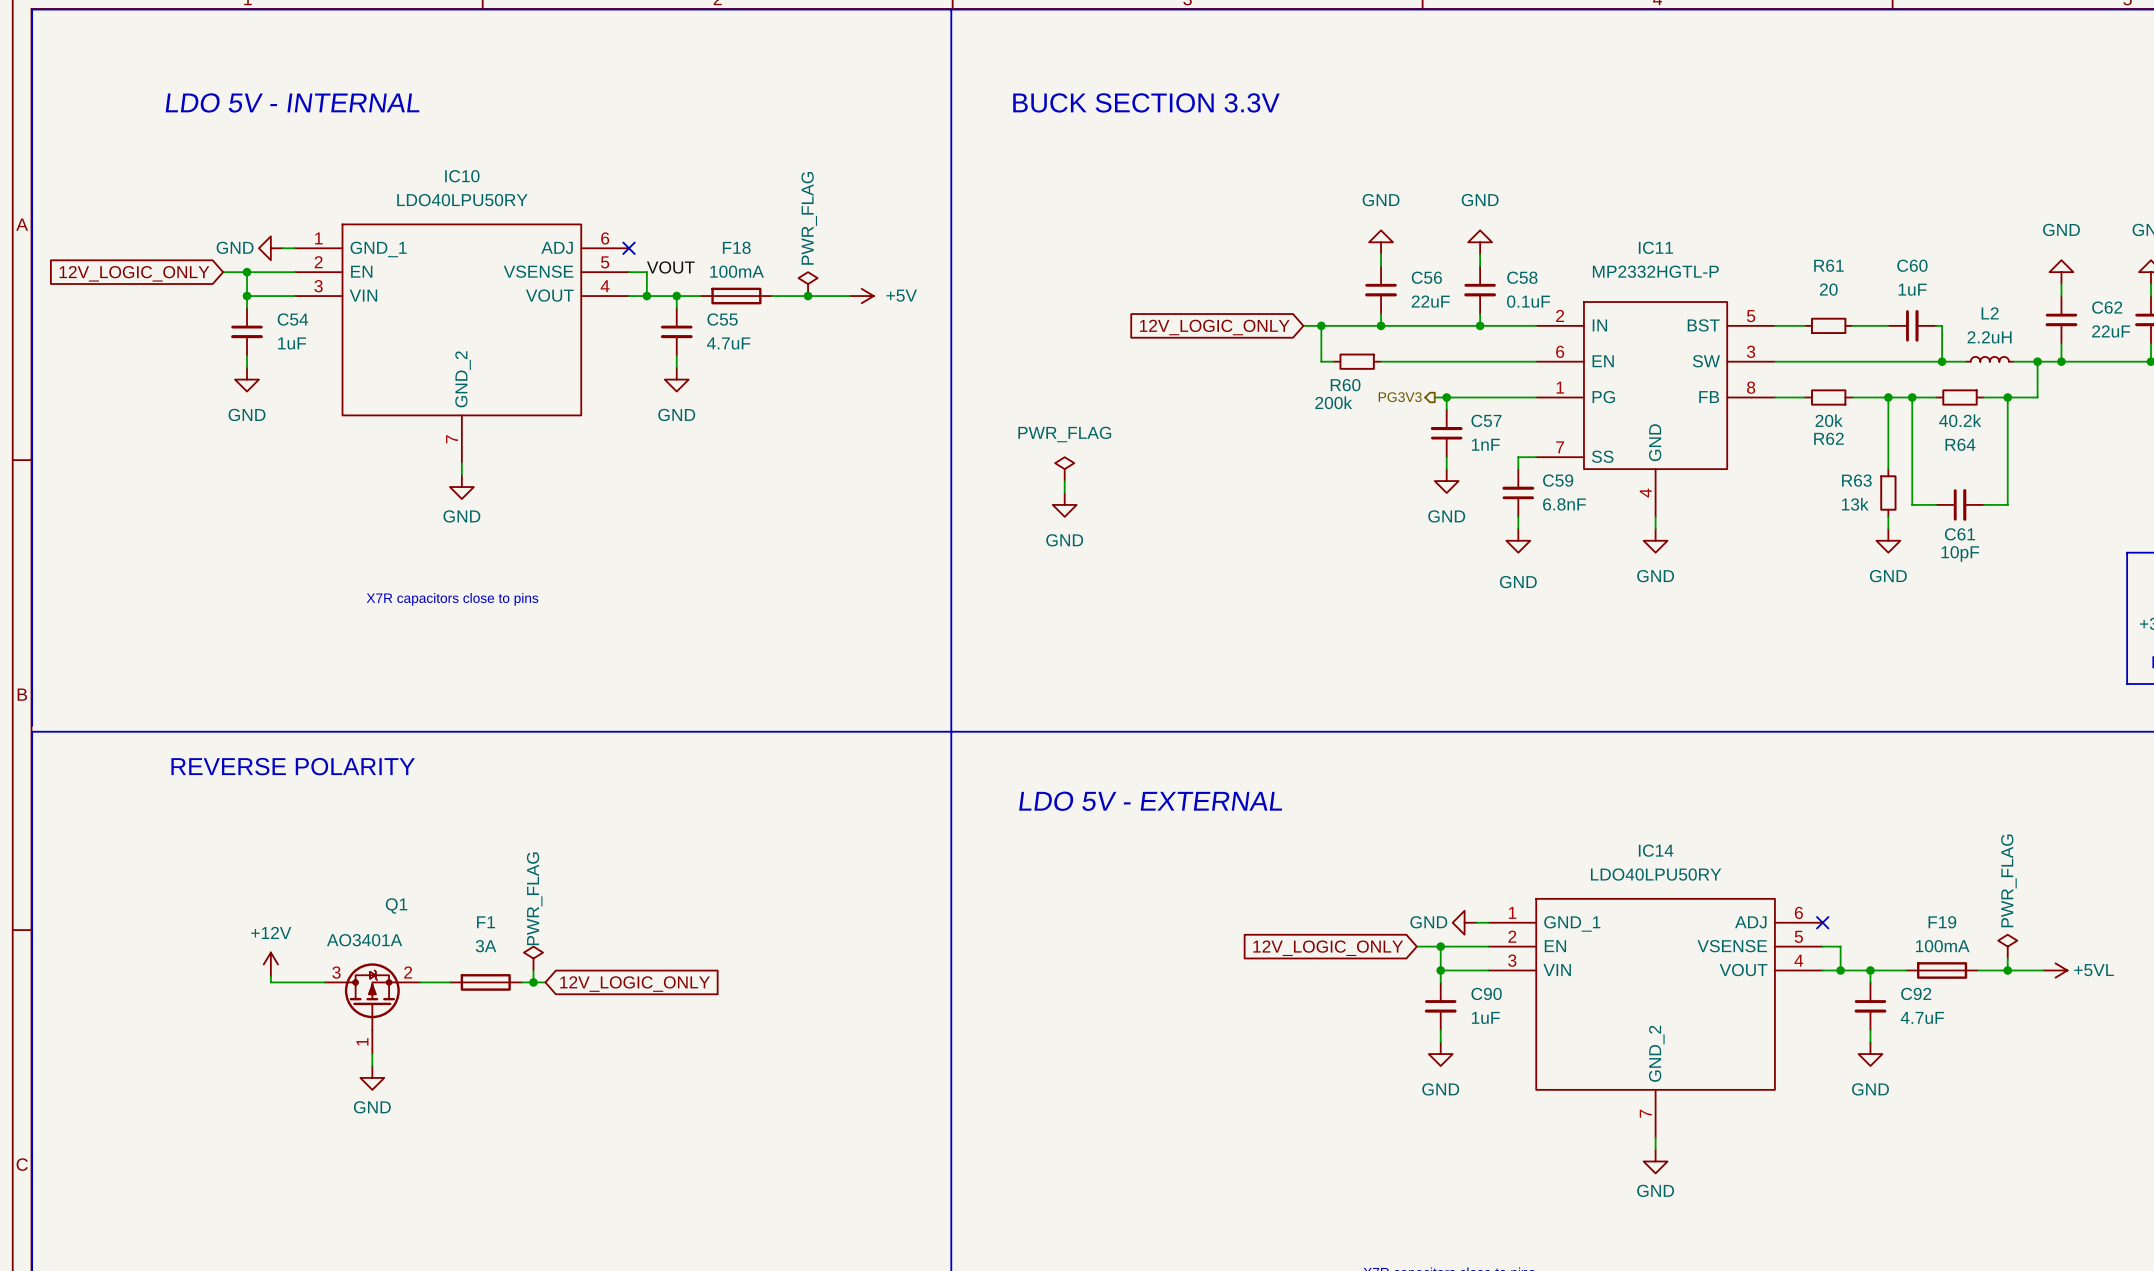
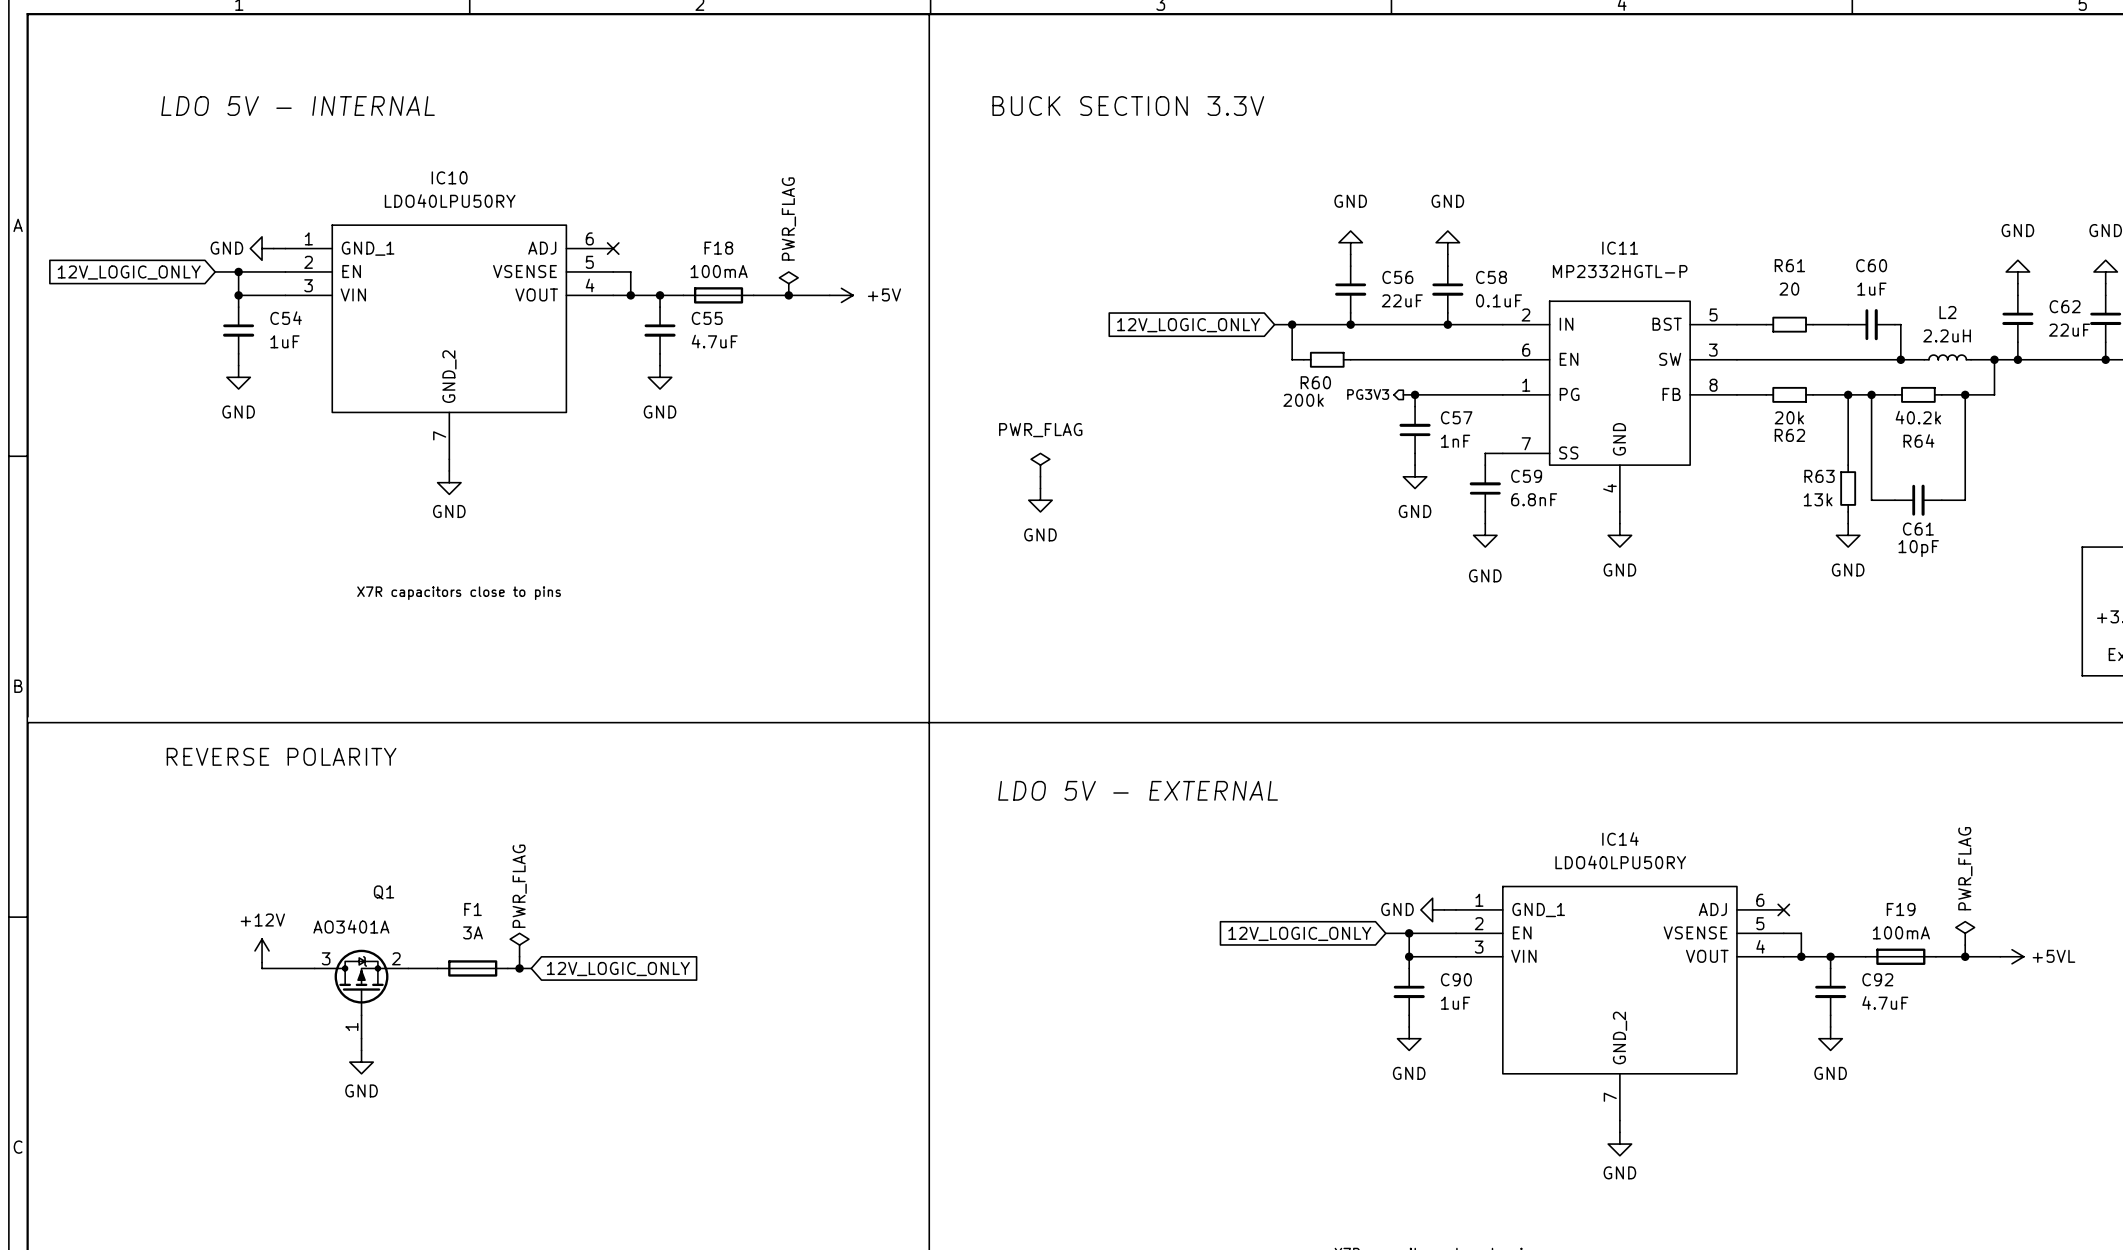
label: VOUT (670, 267) -> none

